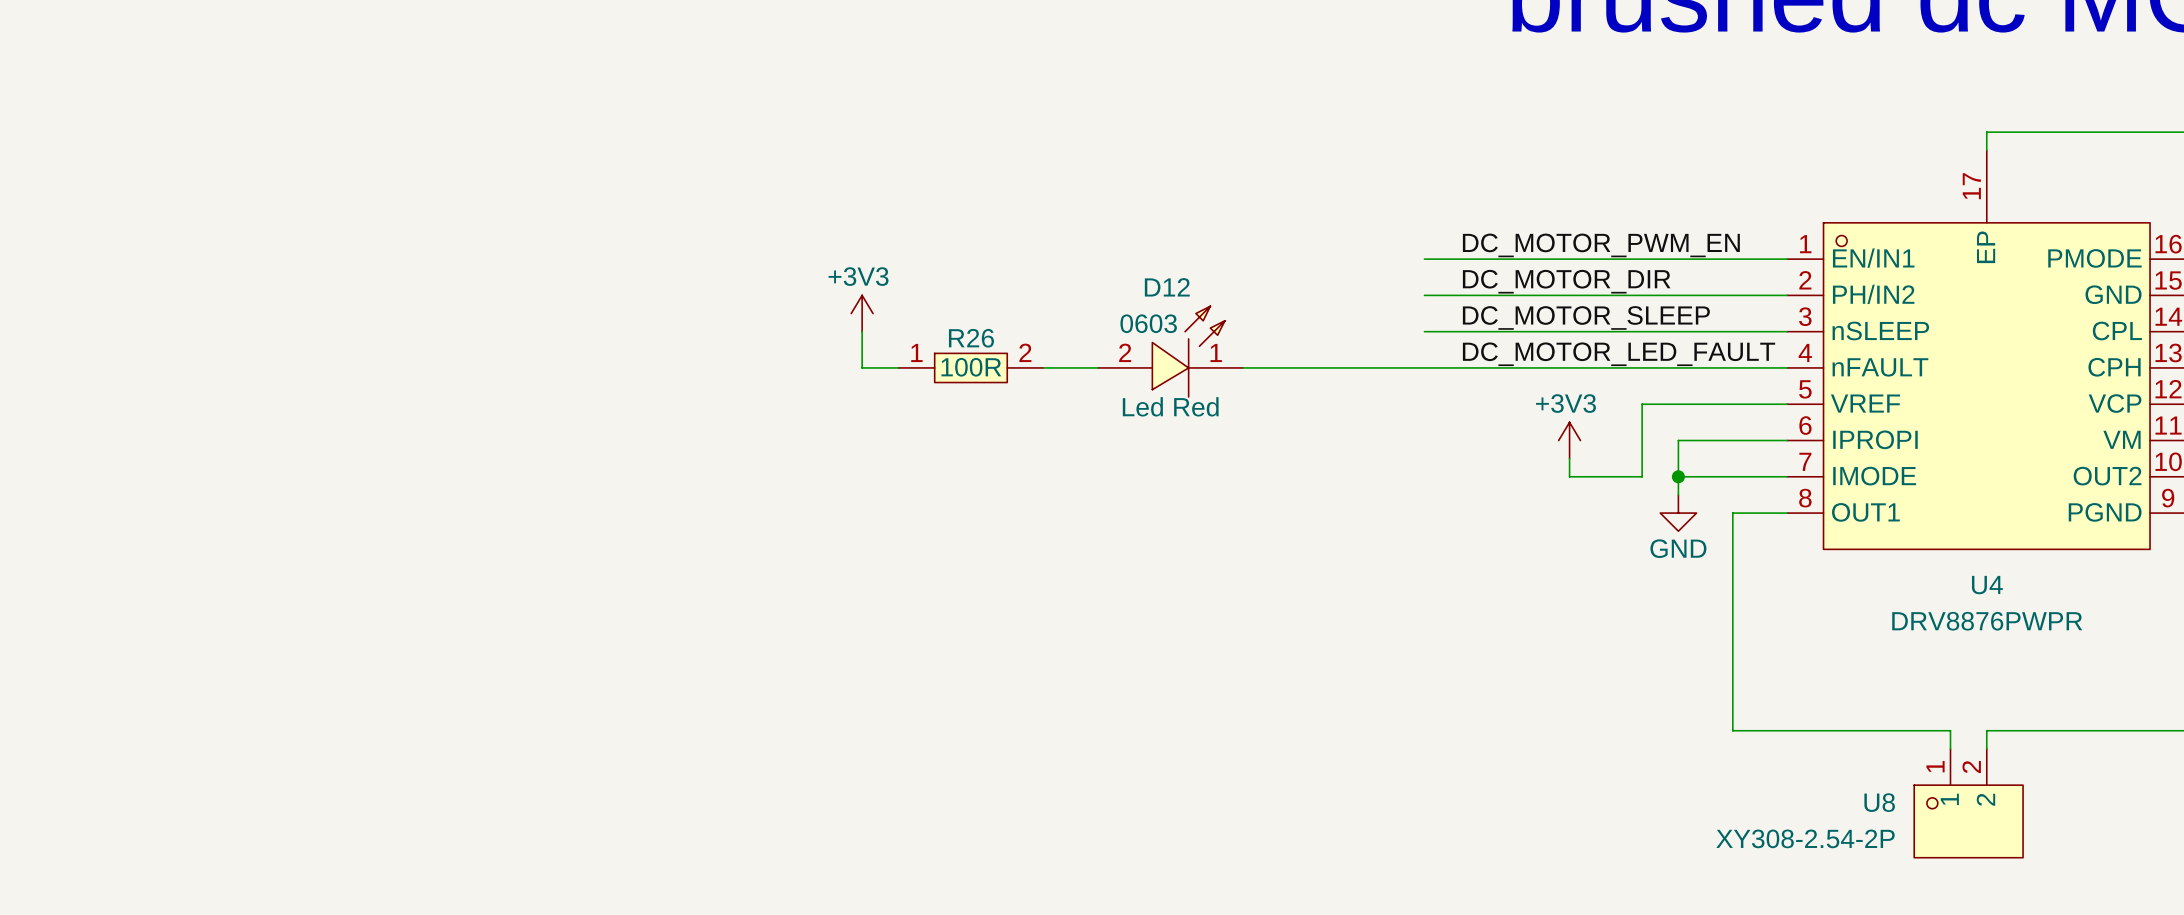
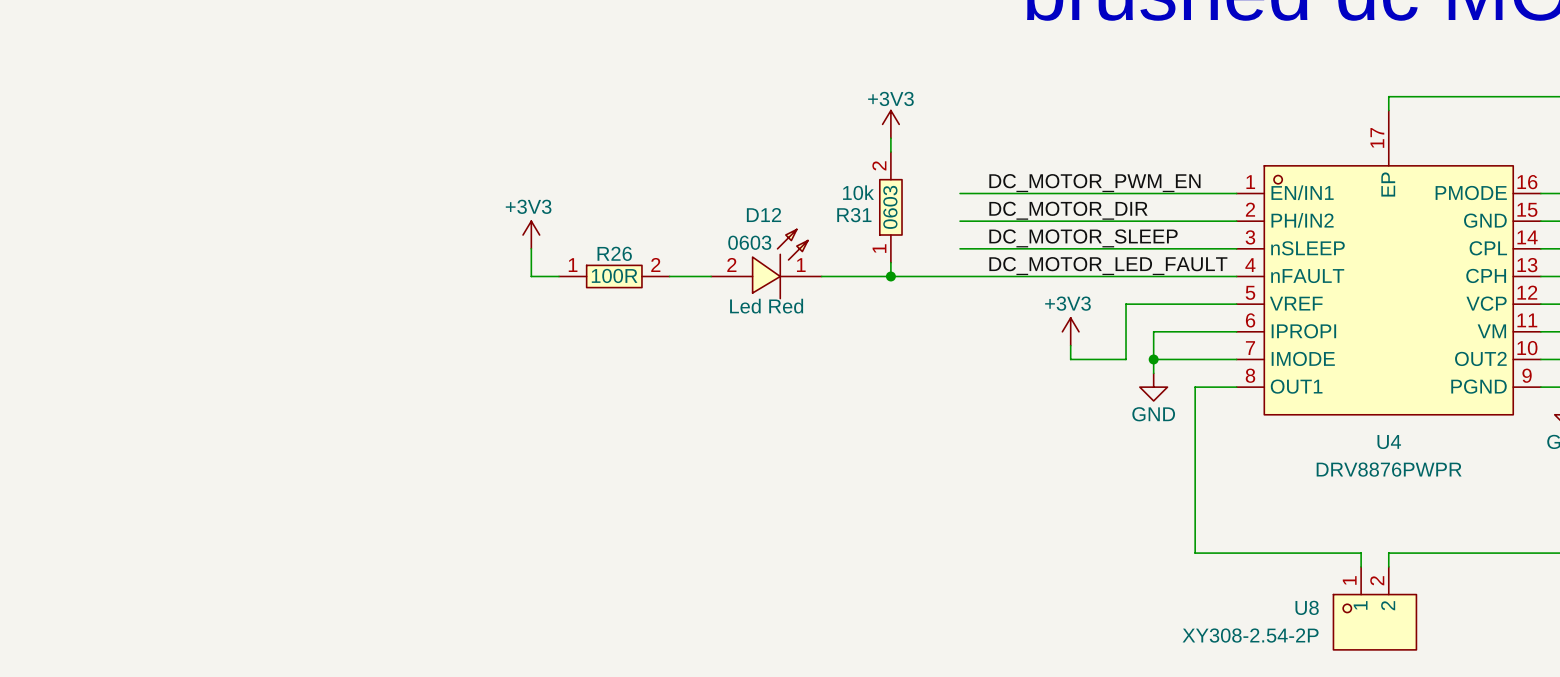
power symbol: none -> +3V3 (890, 124)
wire: none -> (890, 138) (890, 152)
R31: none -> (890, 207)
wire: none -> (890, 262) (890, 276)
junction: none -> (890, 276)

